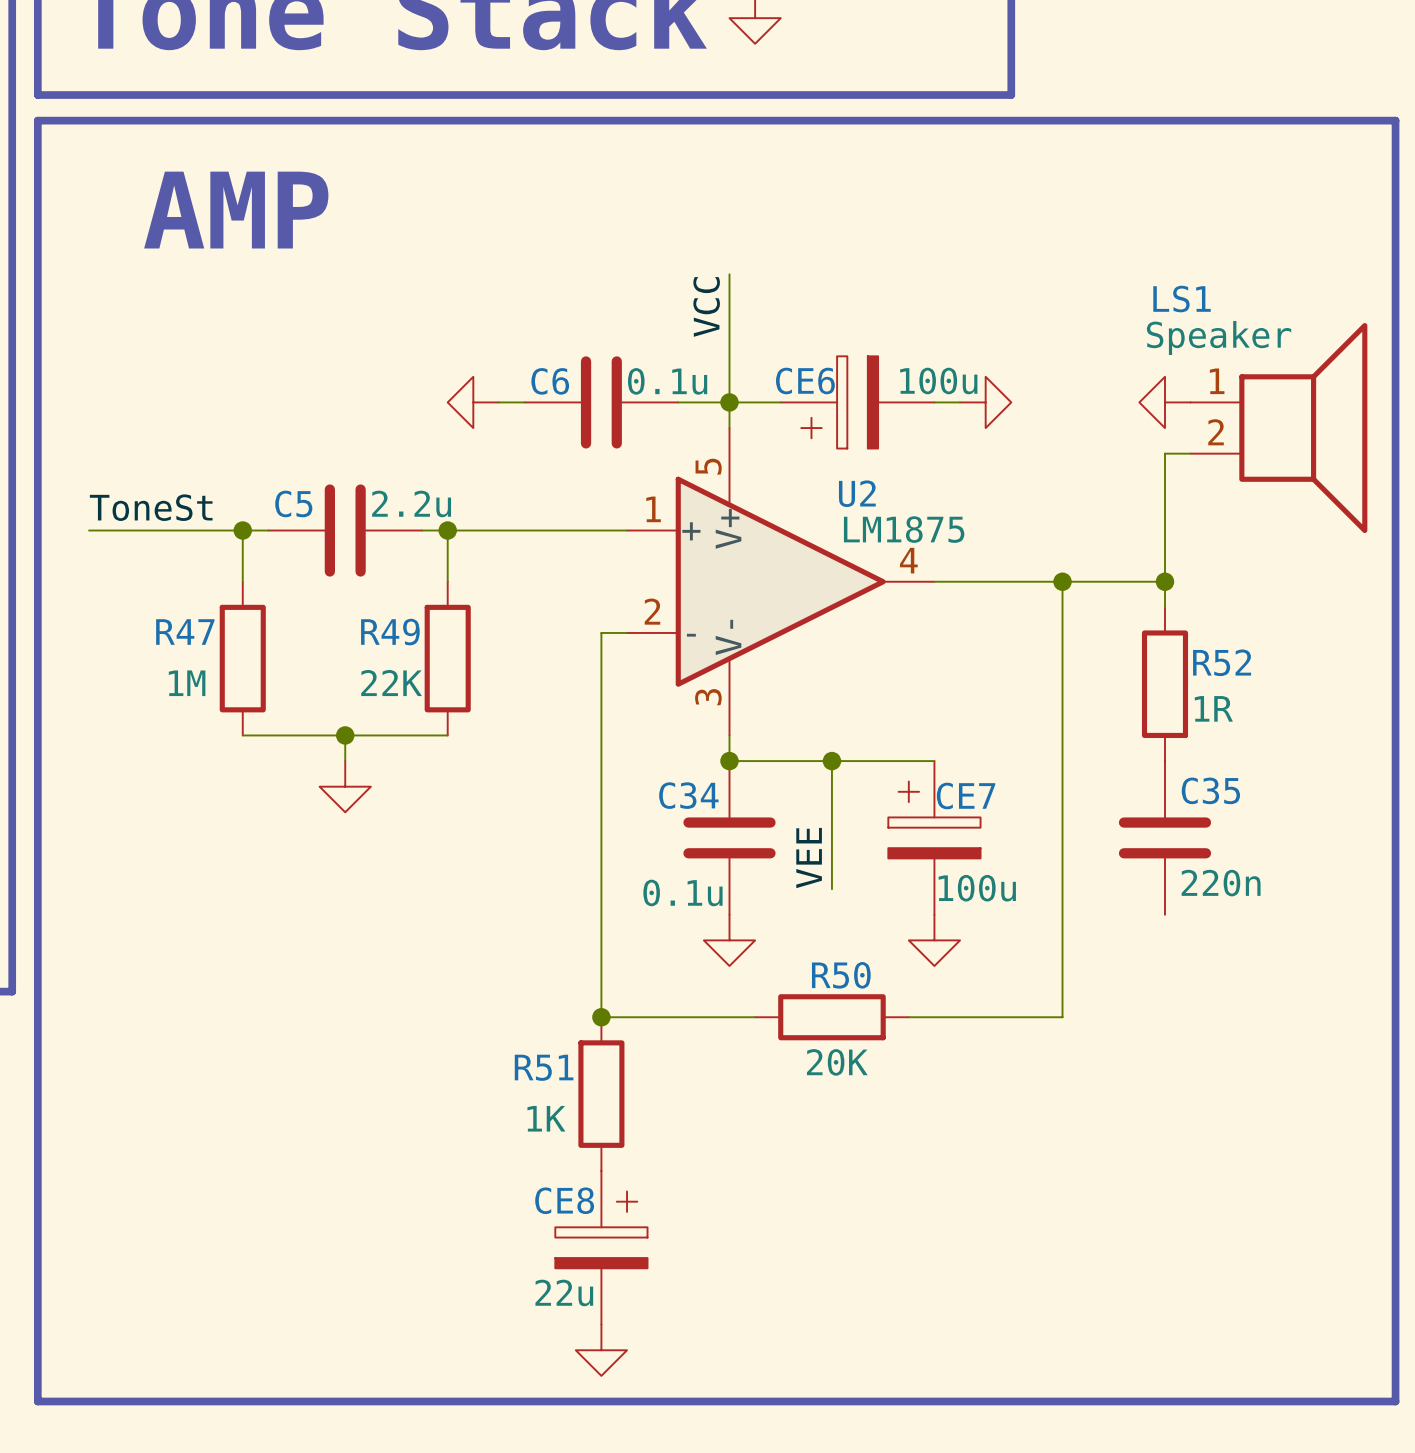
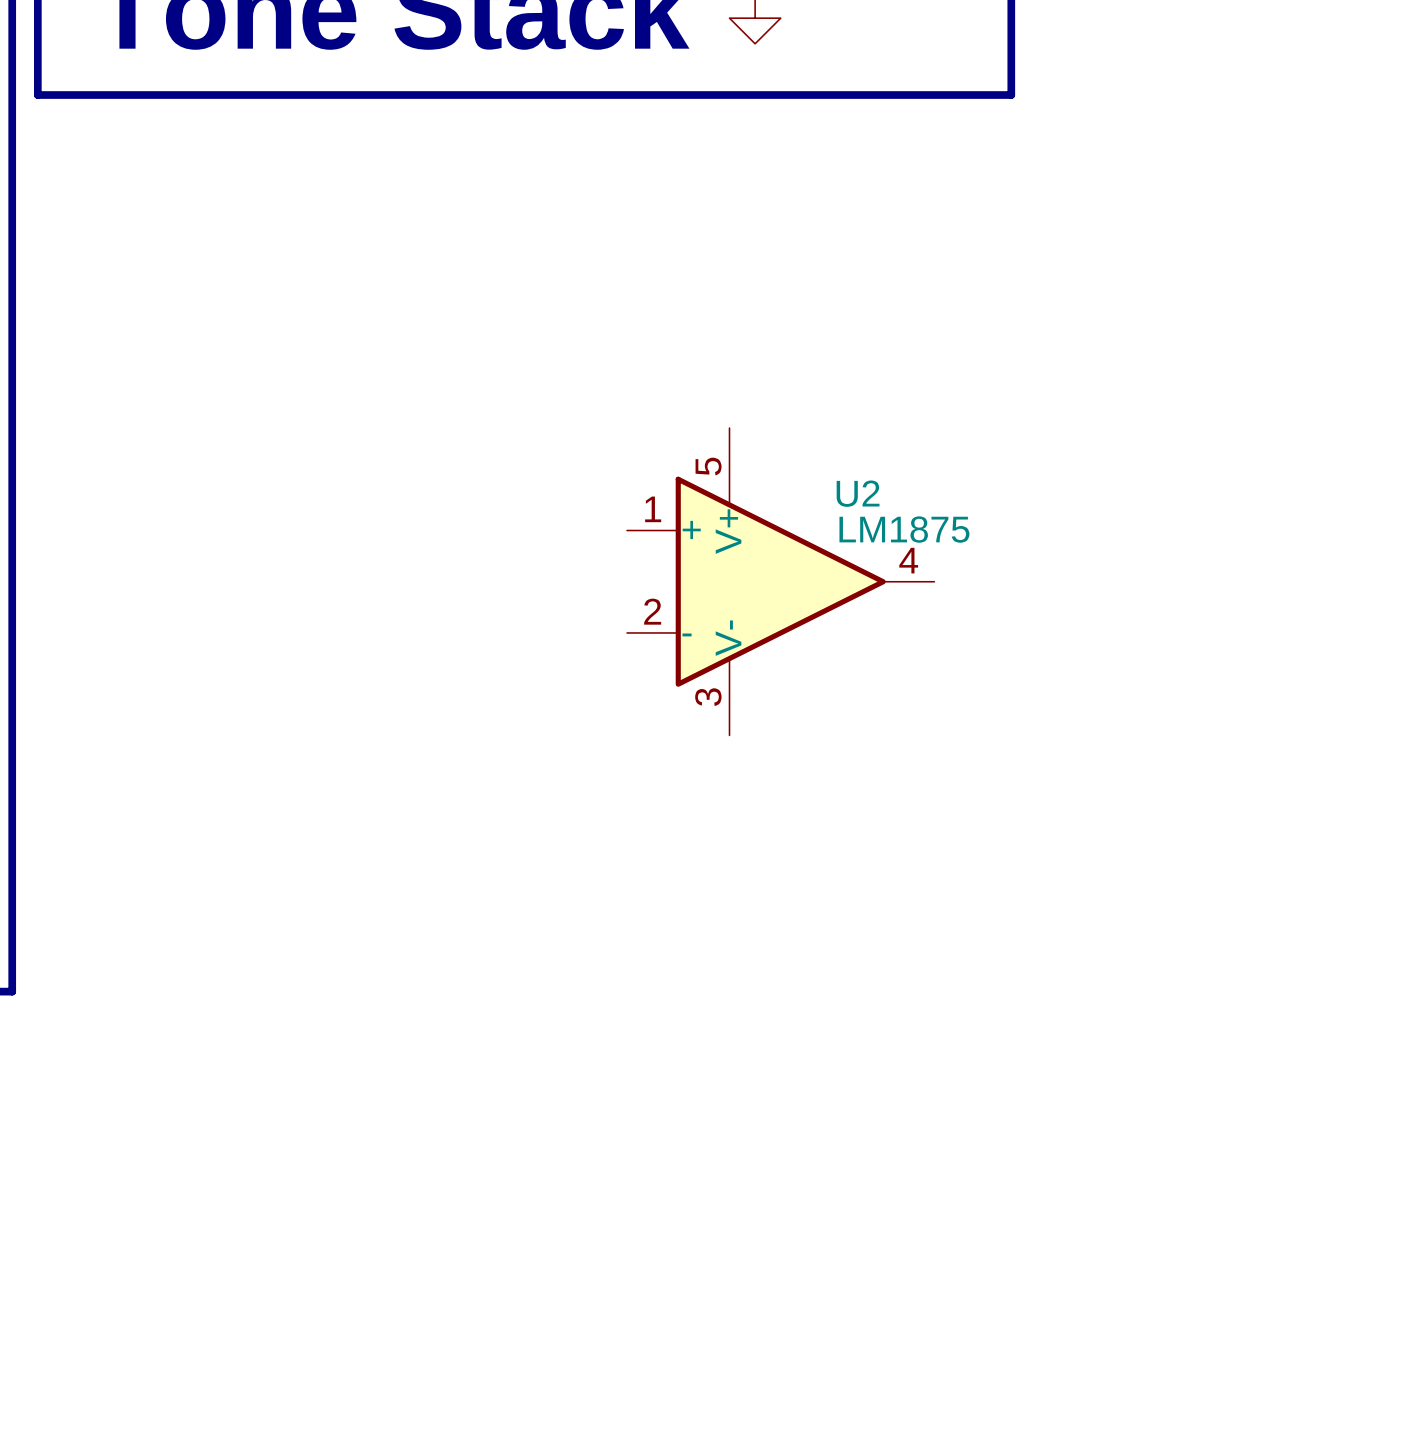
line: (37, 120) (37, 1401) (1395, 1401) (1395, 120) (37, 120) -> none
text: AMP (236, 210) -> none
wire: (729, 274) (729, 428) -> none
label: VCC (706, 306) -> none
power symbol: (473, 402) -> none
wire: (498, 402) (524, 402) -> none
C6: 0.1u (601, 402) -> none
wire: (678, 402) (780, 402) -> none
junction: (729, 402) -> none
CE6: 100u (857, 402) -> none
wire: (934, 402) (960, 402) -> none
power symbol: (985, 402) -> none
power symbol: (1164, 402) -> none
LS1: Speaker (1278, 428) -> none
wire: (1190, 453) (1164, 453) (1164, 607) -> none
label: ToneSt (151, 507) -> none
wire: (89, 530) (268, 530) -> none
wire: (242, 530) (242, 581) -> none
junction: (242, 530) -> none
C5: 2.2u (345, 530) -> none
wire: (422, 530) (627, 530) -> none
wire: (447, 530) (447, 581) -> none
junction: (447, 530) -> none
wire: (934, 581) (1164, 581) -> none
wire: (1062, 581) (1062, 1017) (908, 1017) -> none
junction: (1062, 581) -> none
junction: (1164, 581) -> none
wire: (627, 632) (601, 632) (601, 1017) (755, 1017) -> none
R47: 1M (242, 658) -> none
R49: 22K (447, 658) -> none
R52: 1R (1164, 684) -> none
wire: (242, 735) (447, 735) -> none
wire: (345, 735) (345, 761) -> none
junction: (345, 735) -> none
wire: (729, 735) (729, 761) (934, 761) -> none
junction: (729, 761) -> none
wire: (831, 761) (831, 889) -> none
junction: (831, 761) -> none
power symbol: (345, 786) -> none
C34: 0.1u (729, 837) -> none
CE7: 100u (934, 837) -> none
C35: 220n (1164, 837) -> none
label: VEE (809, 858) -> none
power symbol: (729, 940) -> none
power symbol: (934, 940) -> none
junction: (601, 1017) -> none
R50: 20K (831, 1017) -> none
R51: 1K (601, 1094) -> none
CE8: 22u (601, 1247) -> none
power symbol: (601, 1350) -> none

